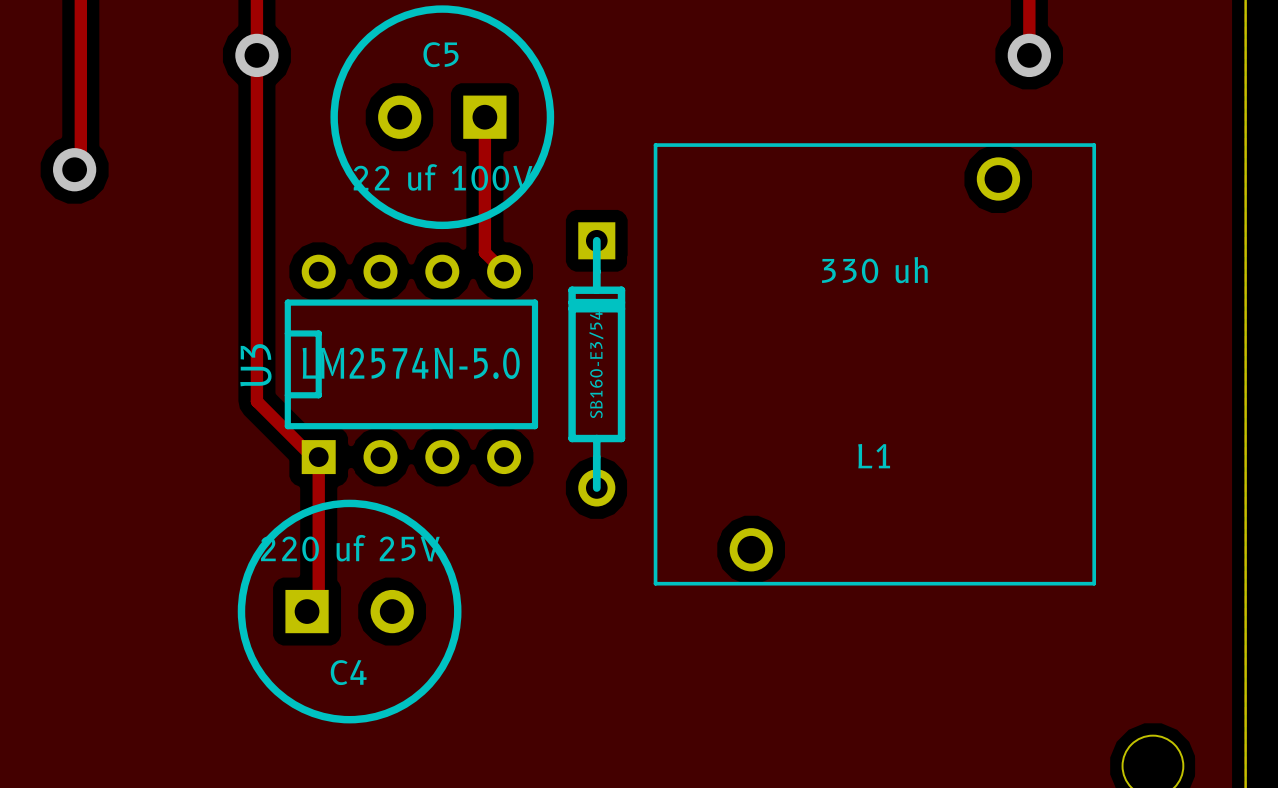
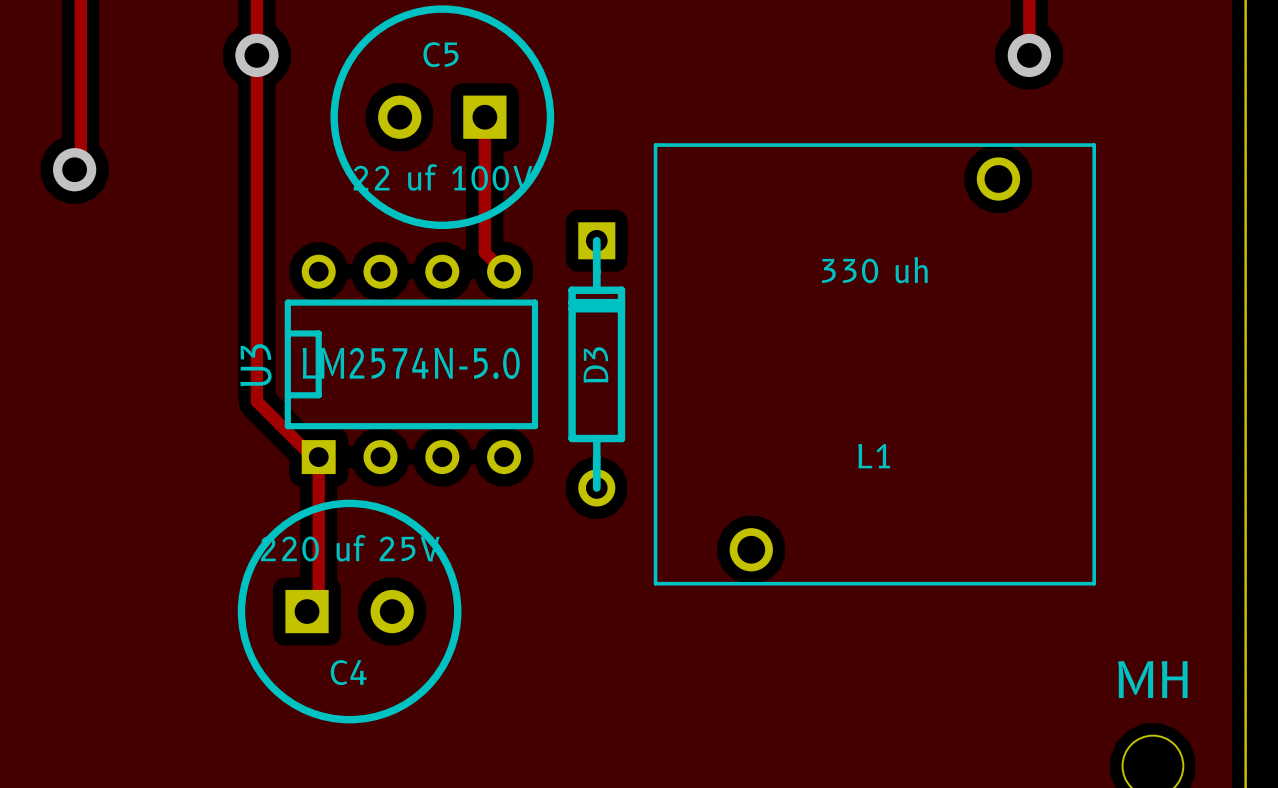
D3 name: none -> D3 (595, 364)
D3 value: SB160-E3/54 (596, 364) -> none
MH name: none -> MH (1152, 679)

